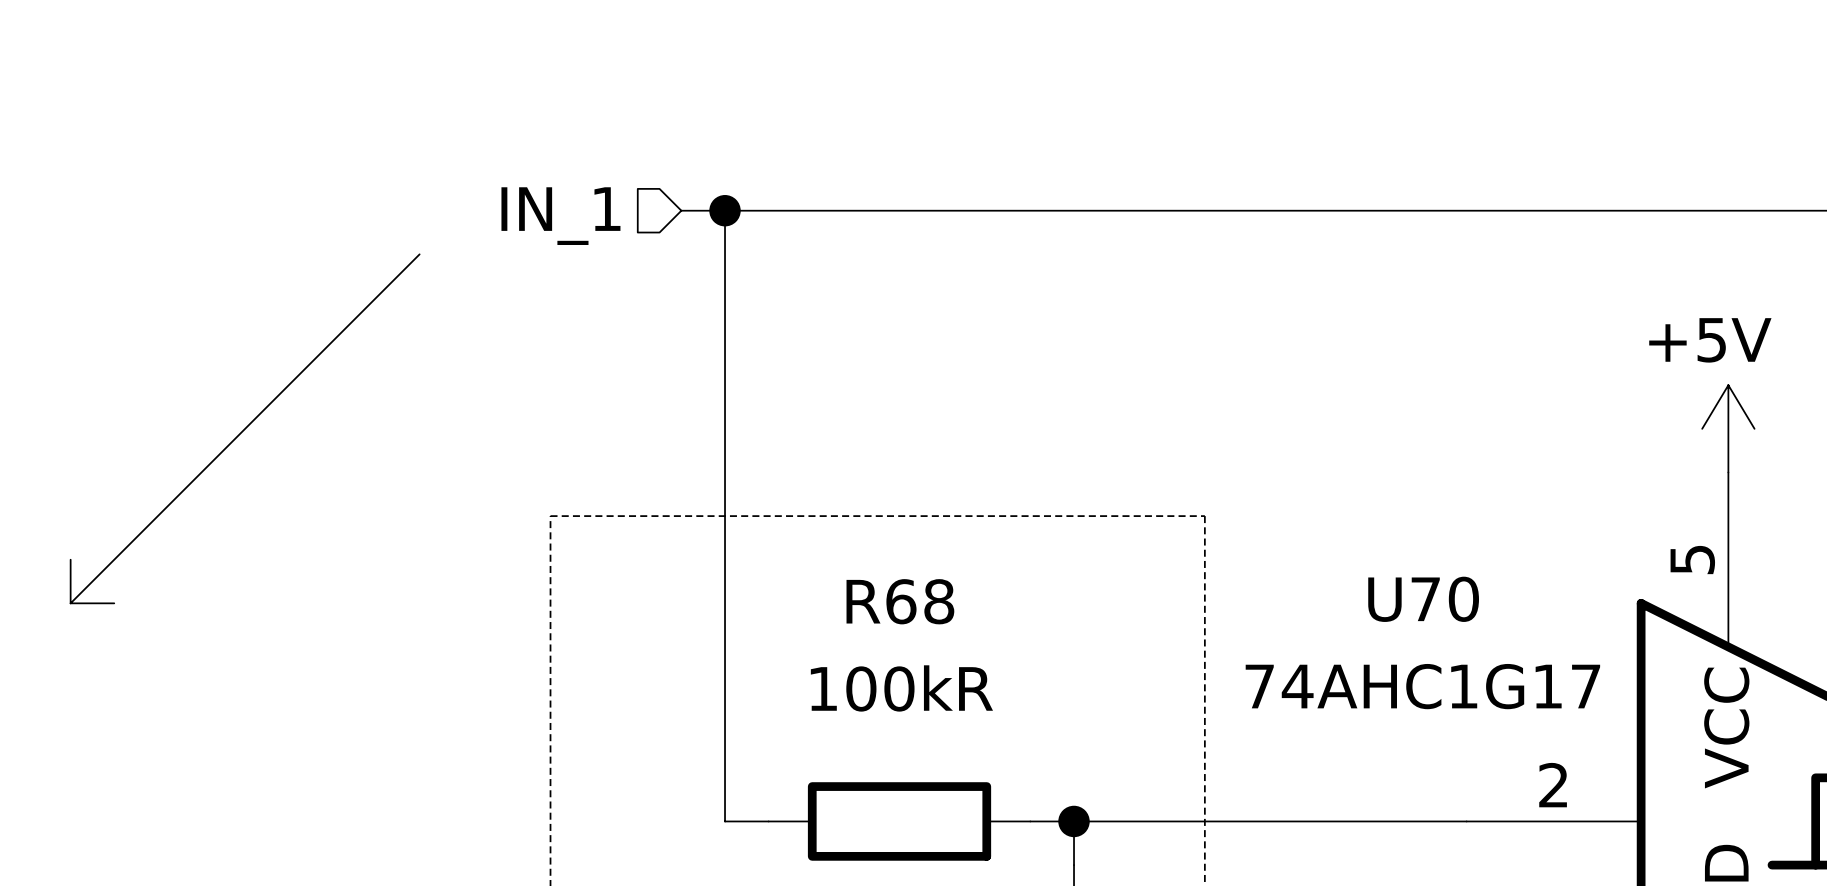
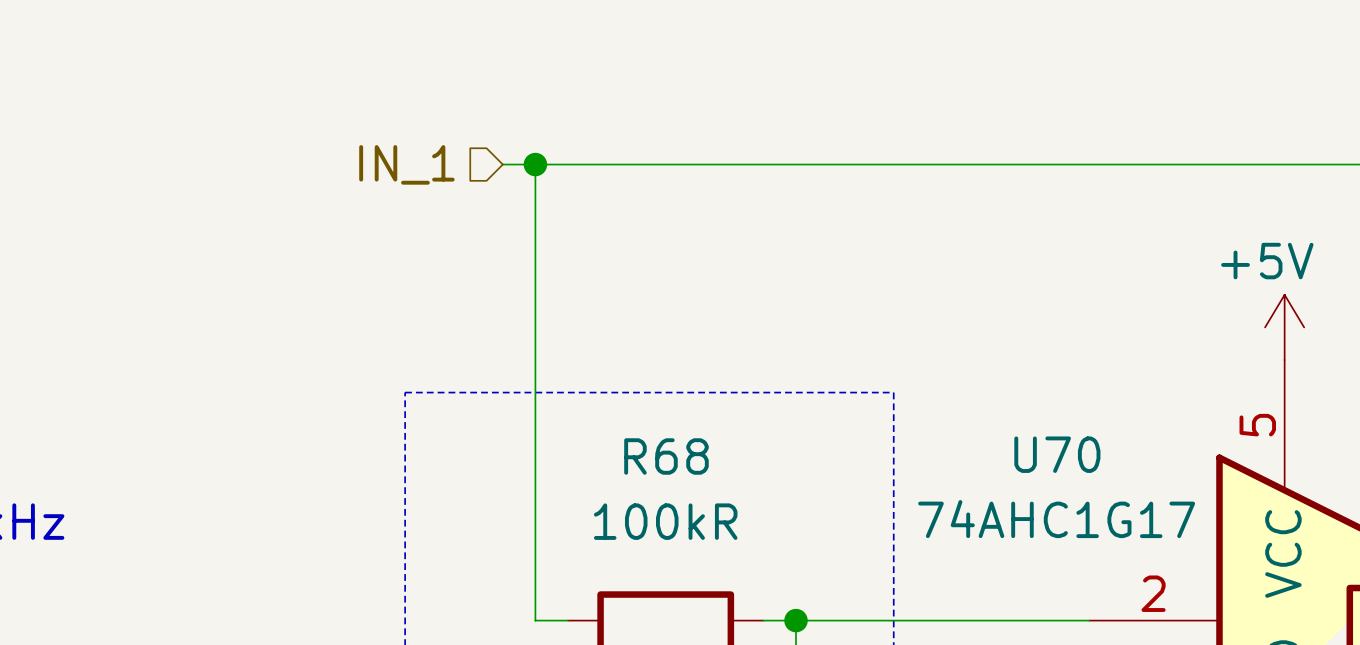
line: (419, 254) (70, 603) -> none
line: (70, 559) (70, 603) -> none
line: (70, 603) (114, 603) -> none

